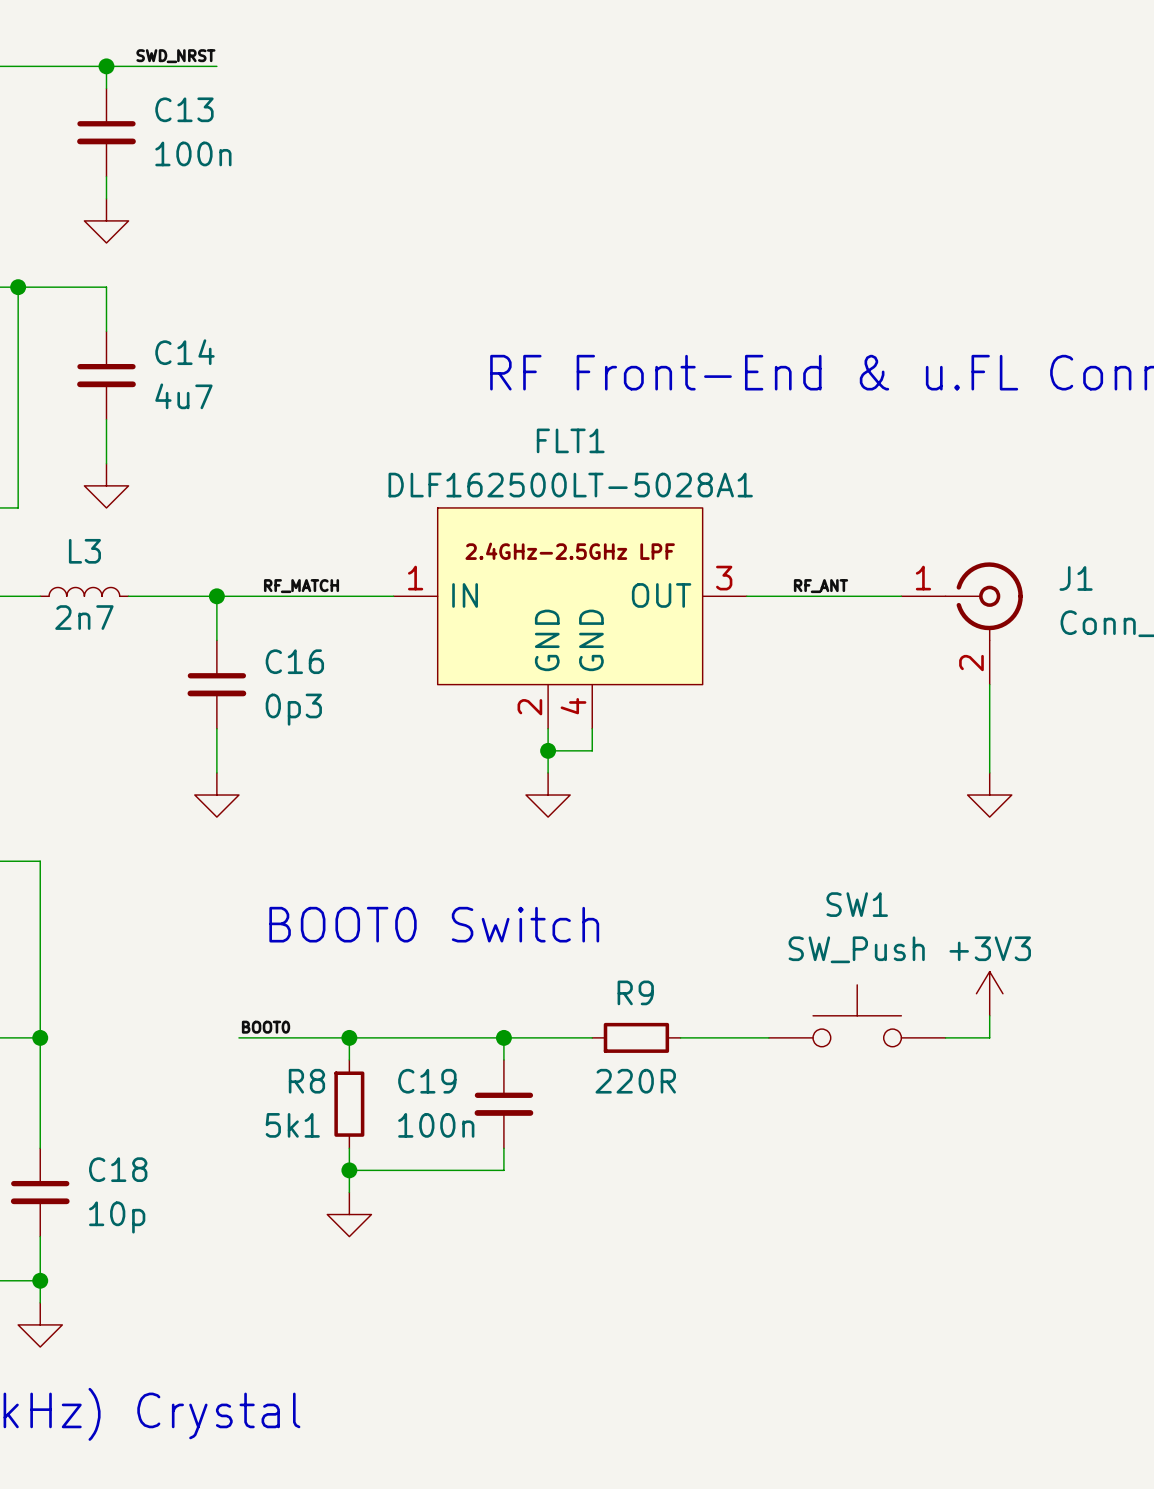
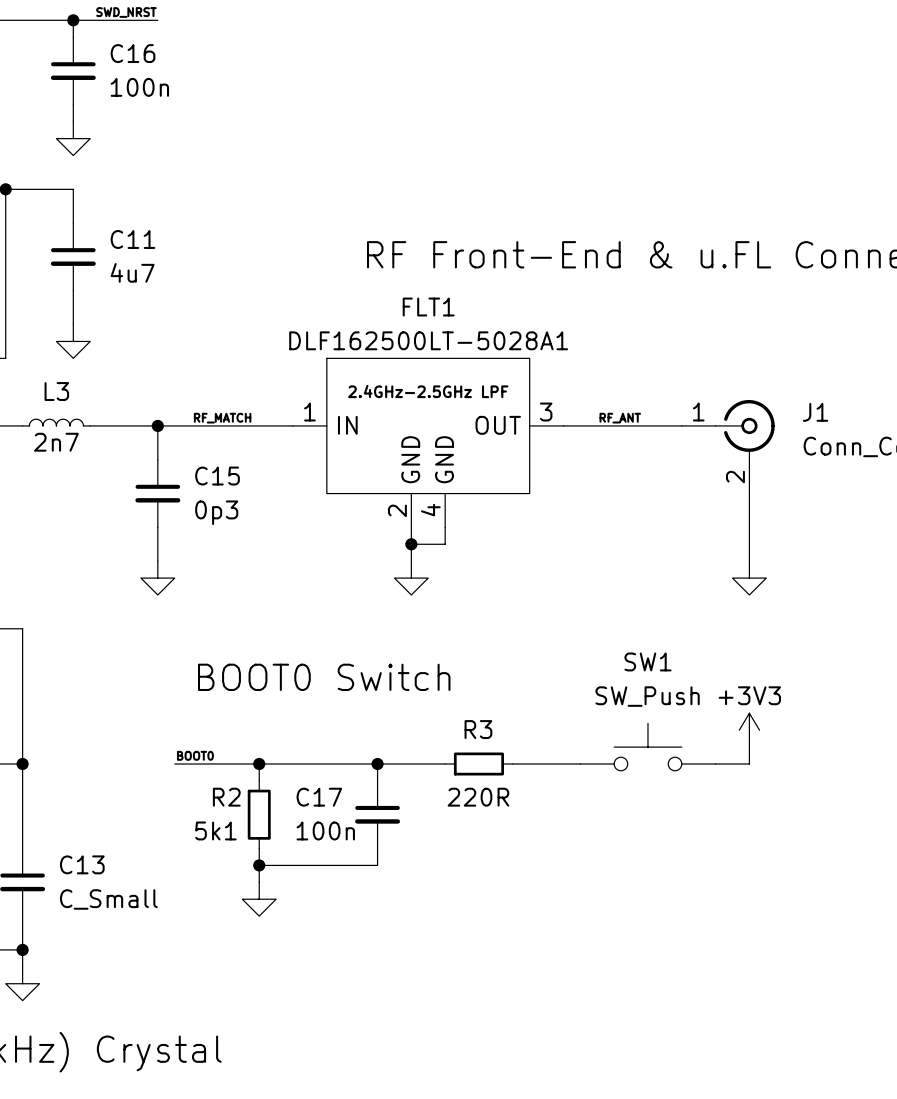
C13 name: C13 (184, 109) -> C16 (133, 53)
C14 name: C14 (184, 352) -> C11 (133, 239)
C16 name: C16 (294, 661) -> C15 (217, 476)
R9 name: R9 (635, 992) -> R3 (478, 729)
R8 name: R8 (306, 1081) -> R2 (226, 797)
C19 name: C19 (427, 1081) -> C17 (319, 797)
C18 name: C18 (118, 1169) -> C13 (82, 864)
C18 value: 10p (117, 1217) -> C_Small (108, 899)

